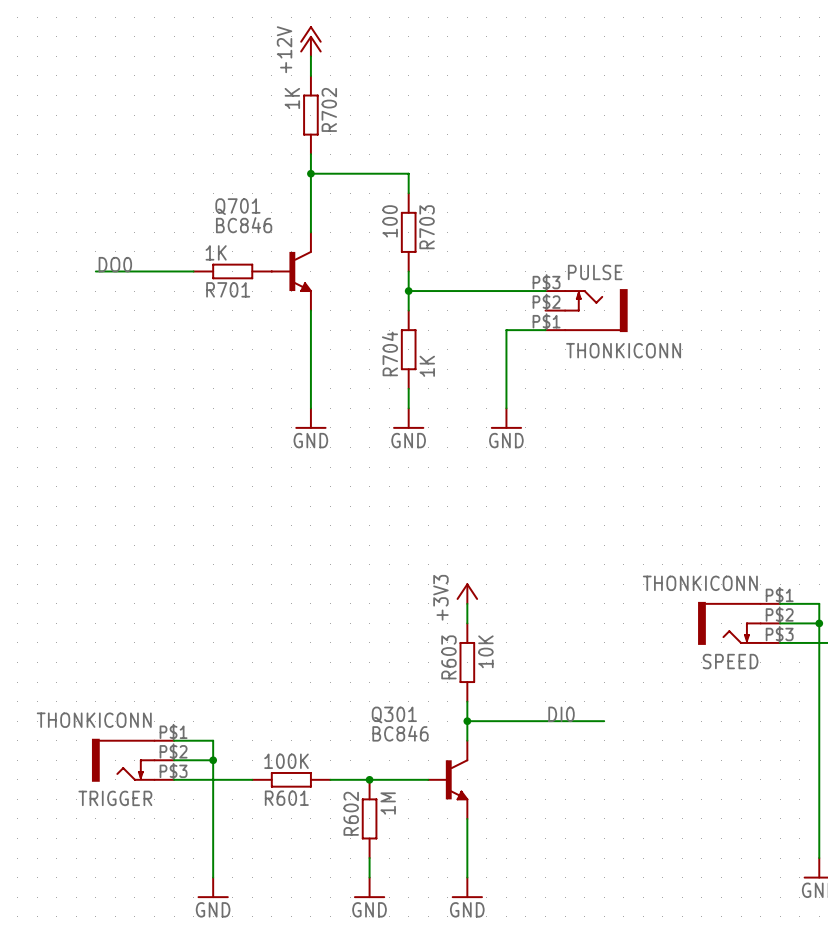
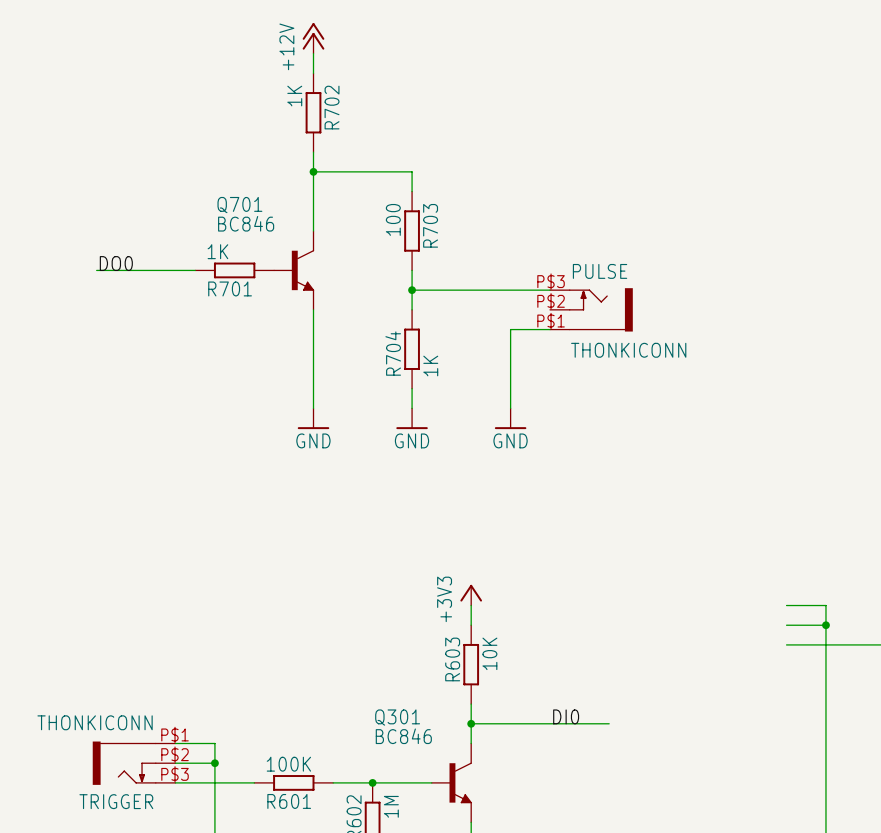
SPEED: THONKICONN (739, 623) -> none

